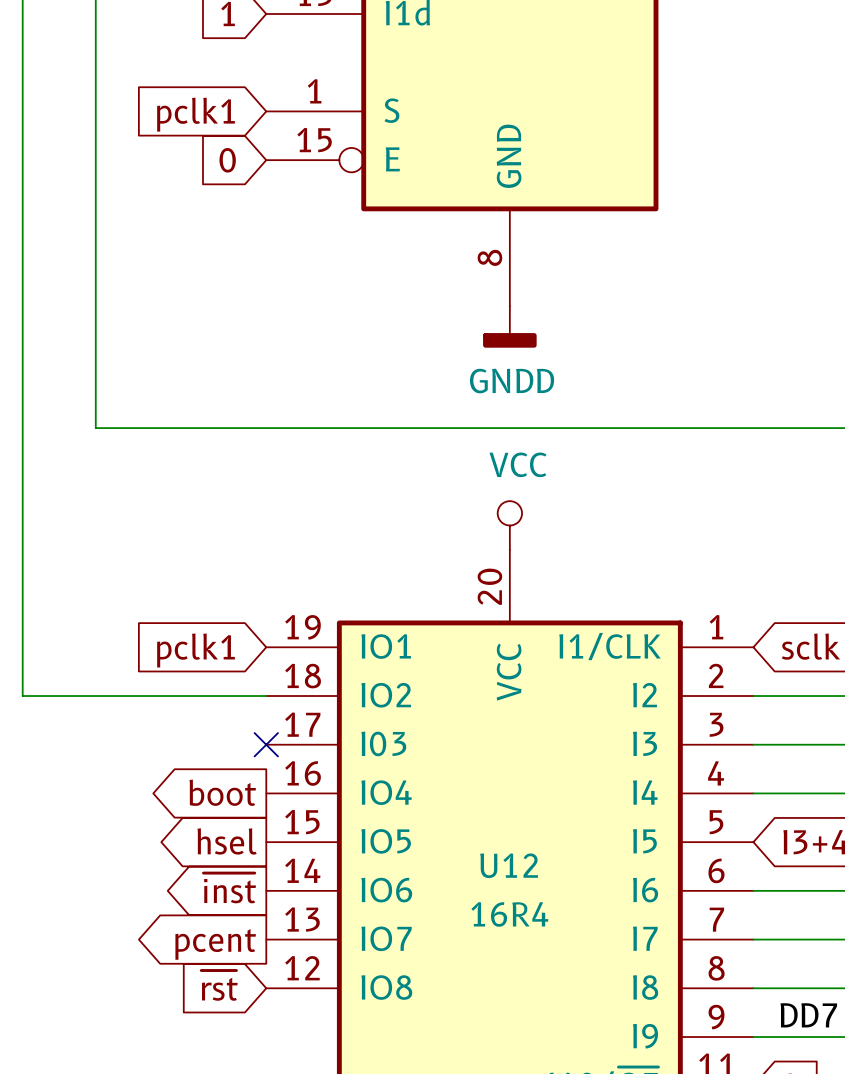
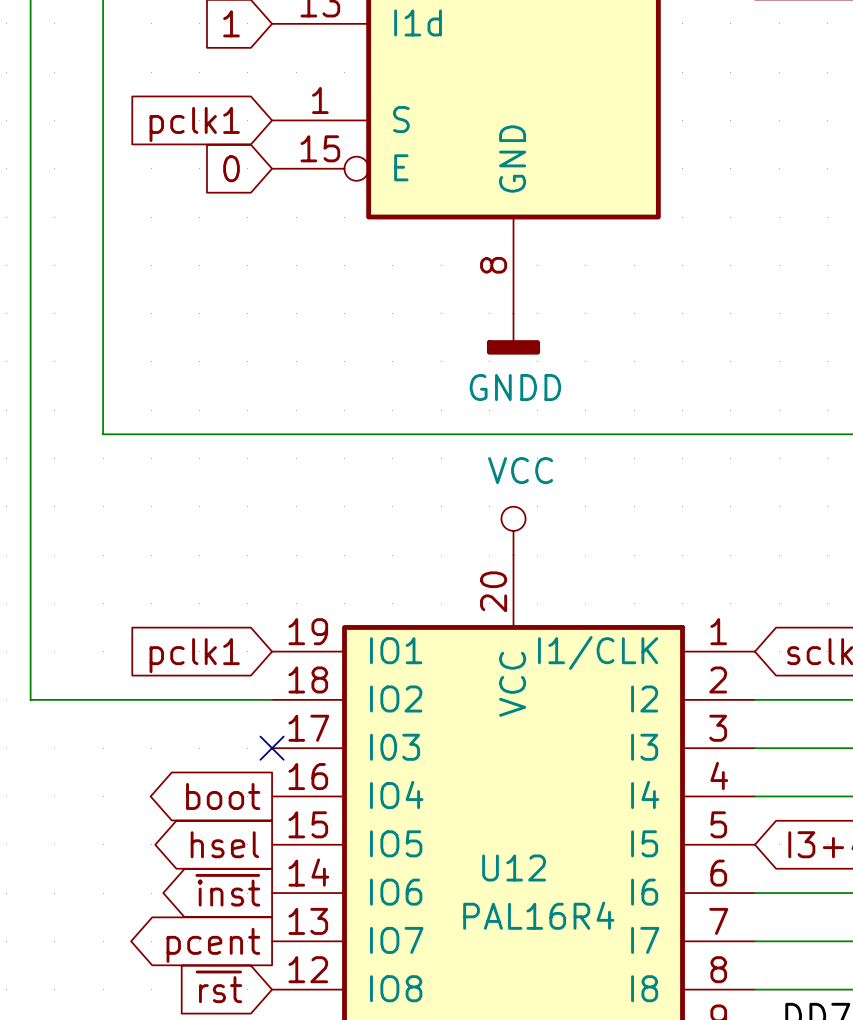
U12 value: 16R4 (509, 914) -> PAL16R4 (538, 915)

